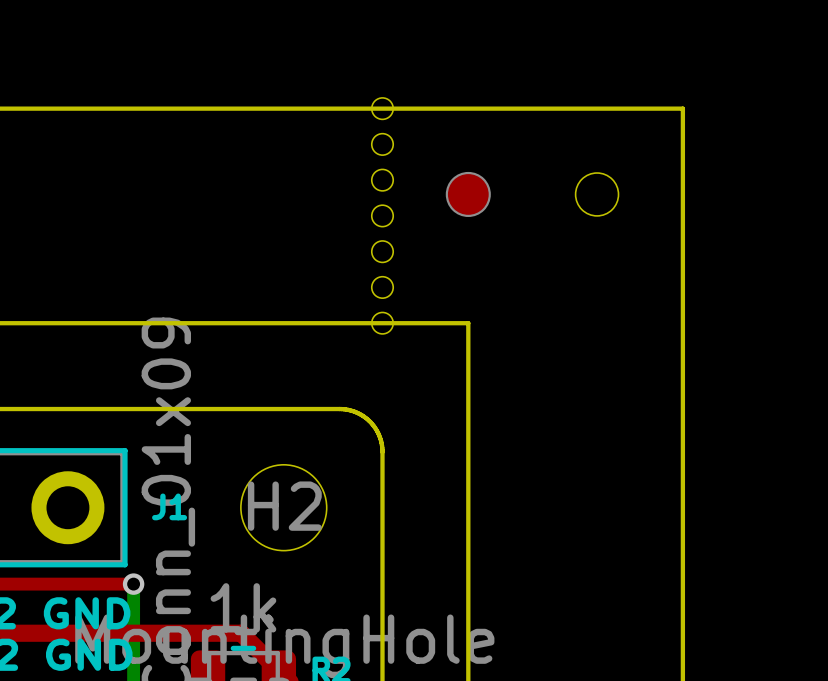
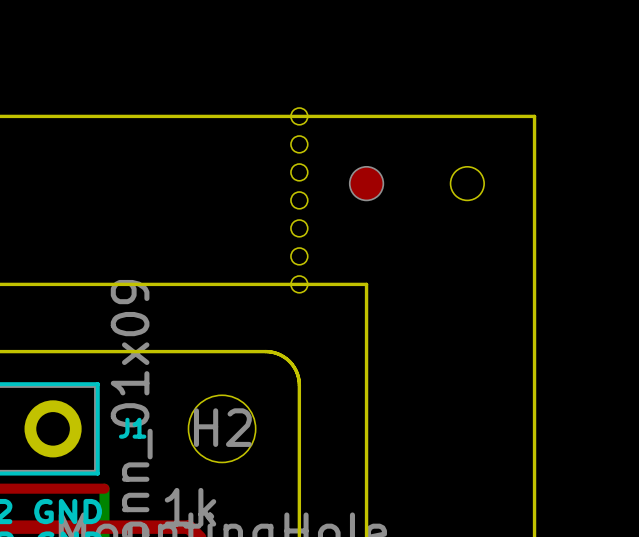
via: (133, 584) -> none

